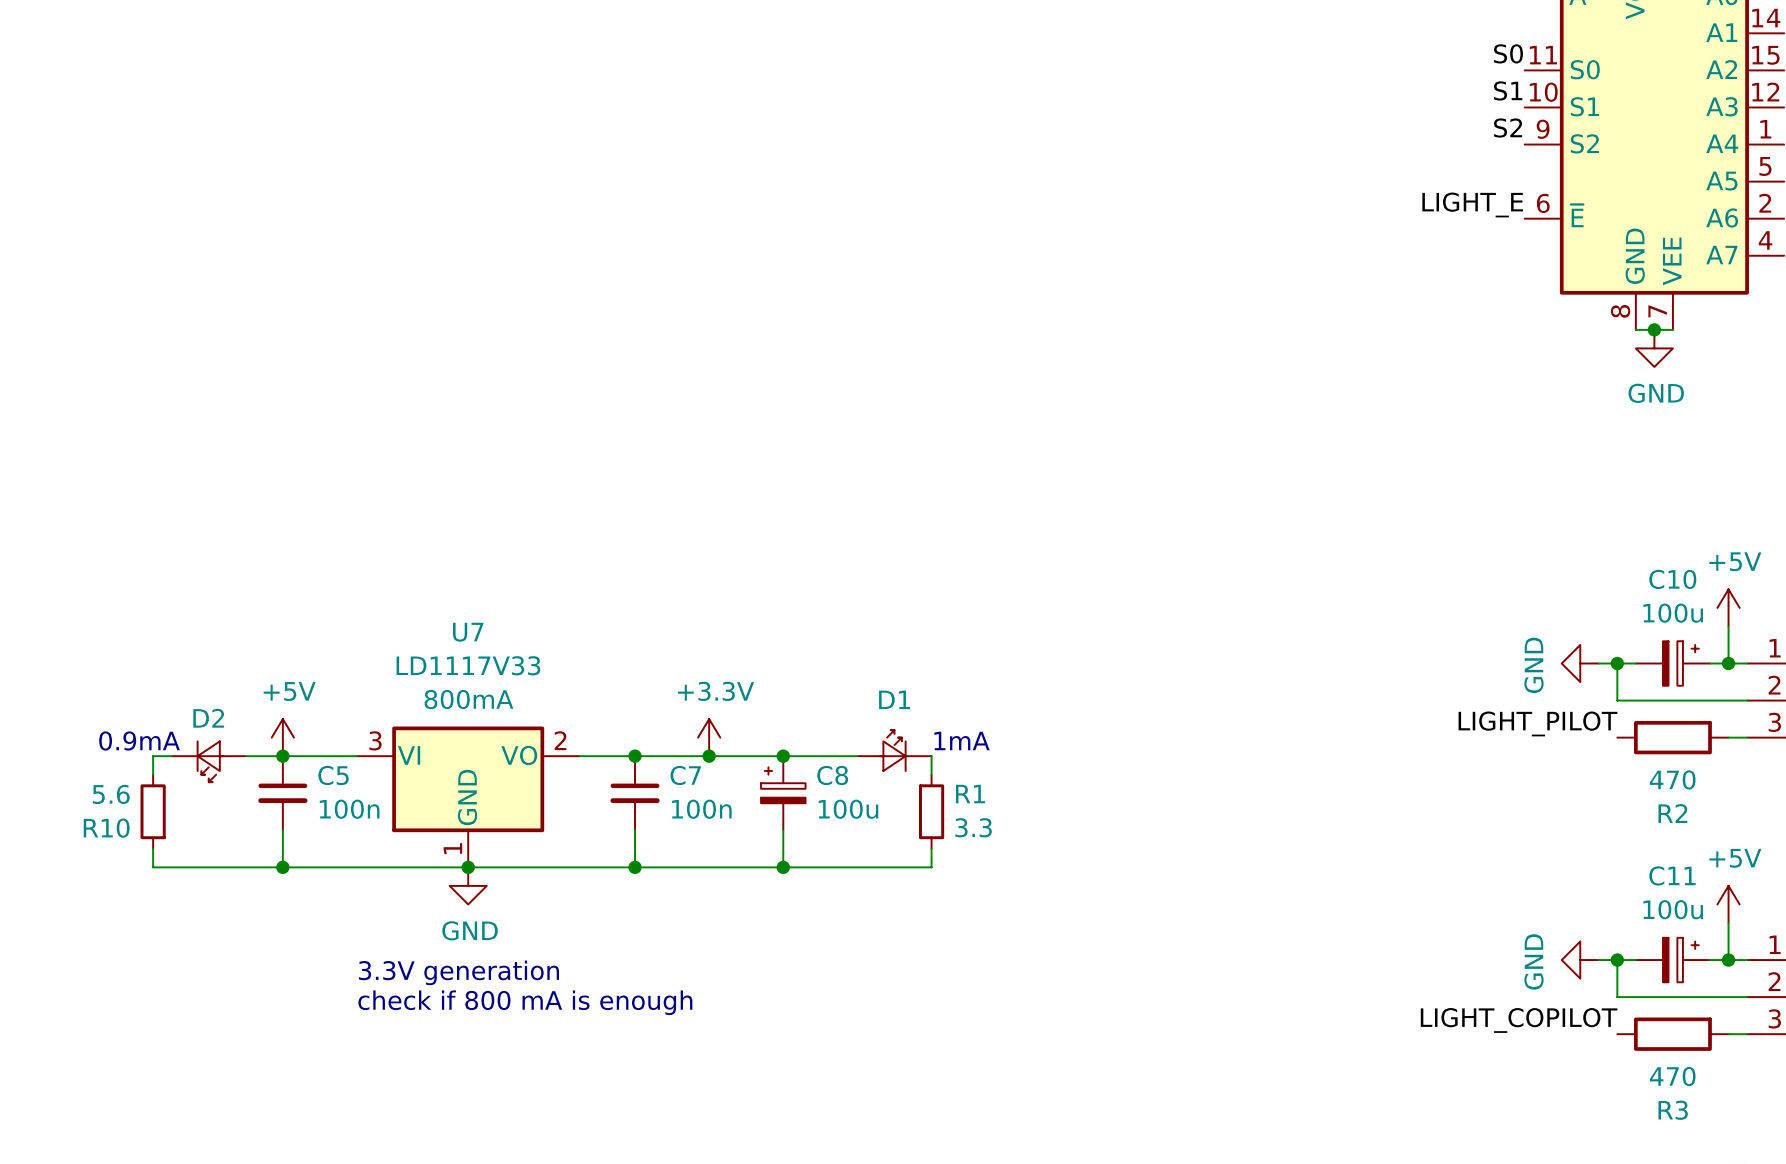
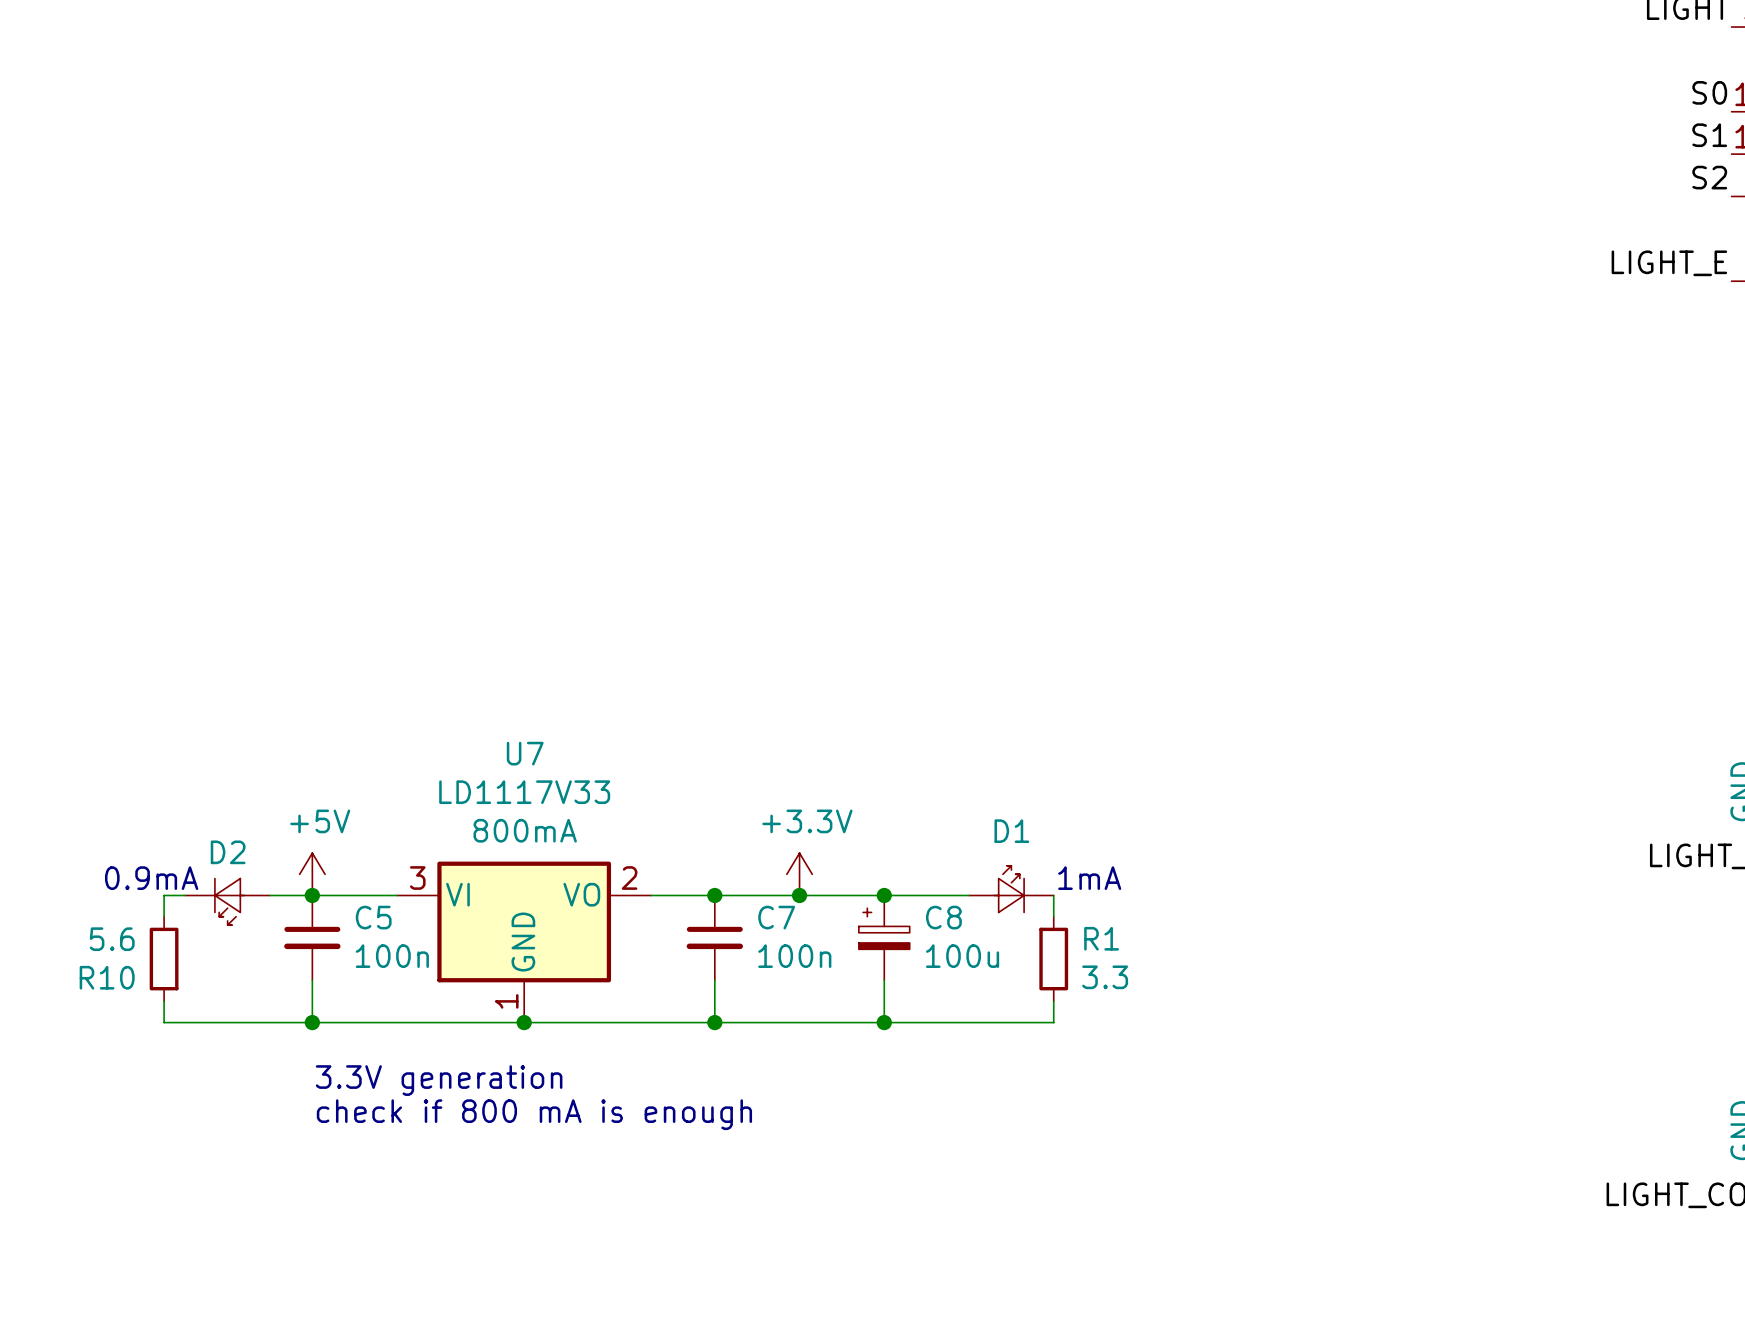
power symbol: GND (468, 885) -> none
text position: 3.3V generation (458, 972) -> 3.3V generation (439, 1080)
text position: check if 800 mA is enough (525, 1002) -> check if 800 mA is enough (534, 1114)

